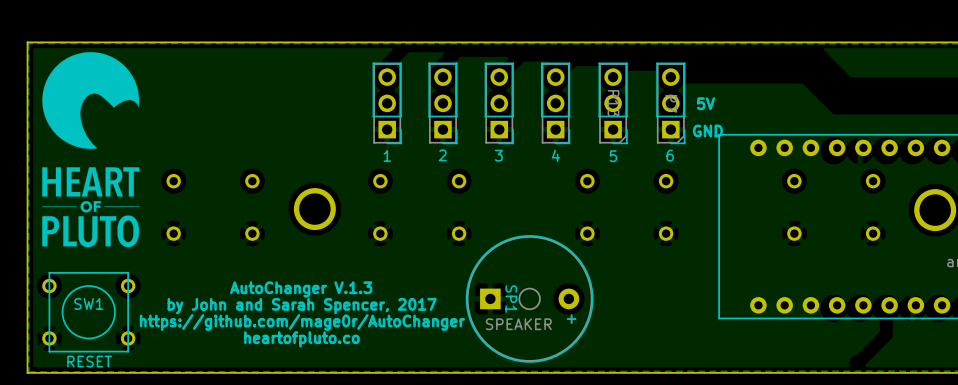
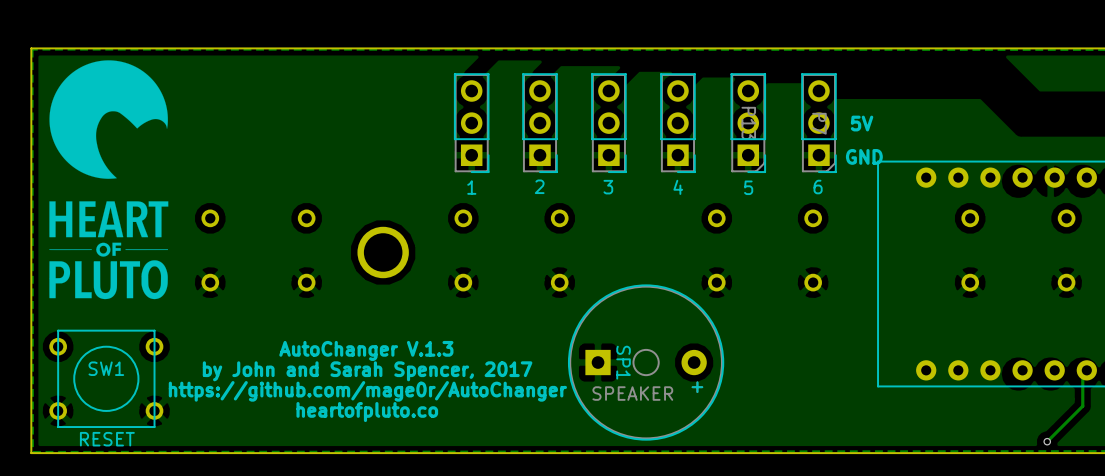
track: none -> (1082, 374) (1082, 406) (1047, 441)
via: none -> (1047, 441)

